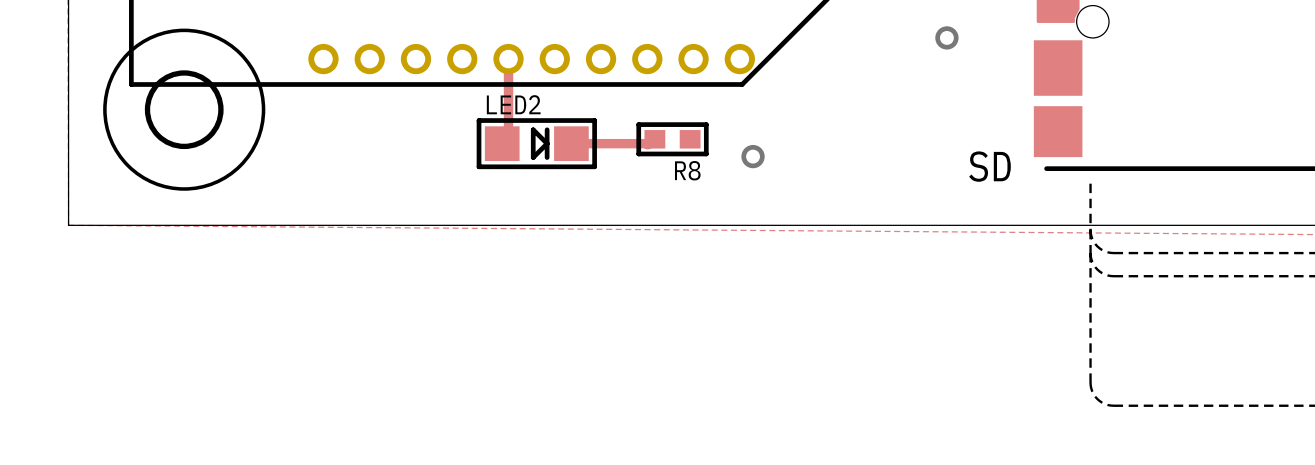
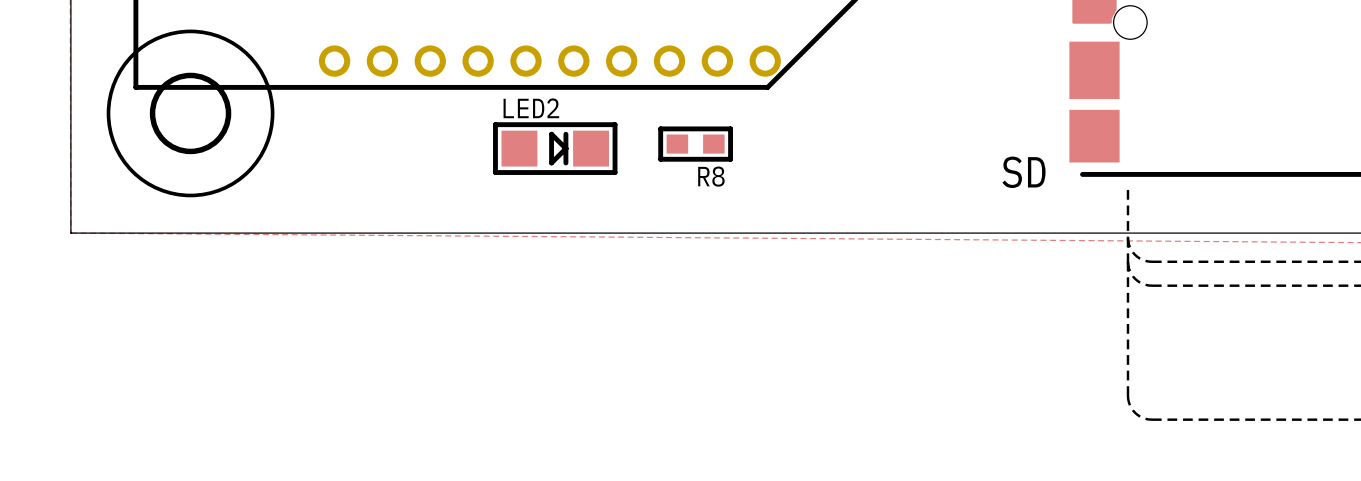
via: (946, 37) -> none
track: (508, 59) (508, 137) (502, 143) -> none
track: (654, 139) (650, 143) (571, 143) -> none
via: (753, 156) -> none

